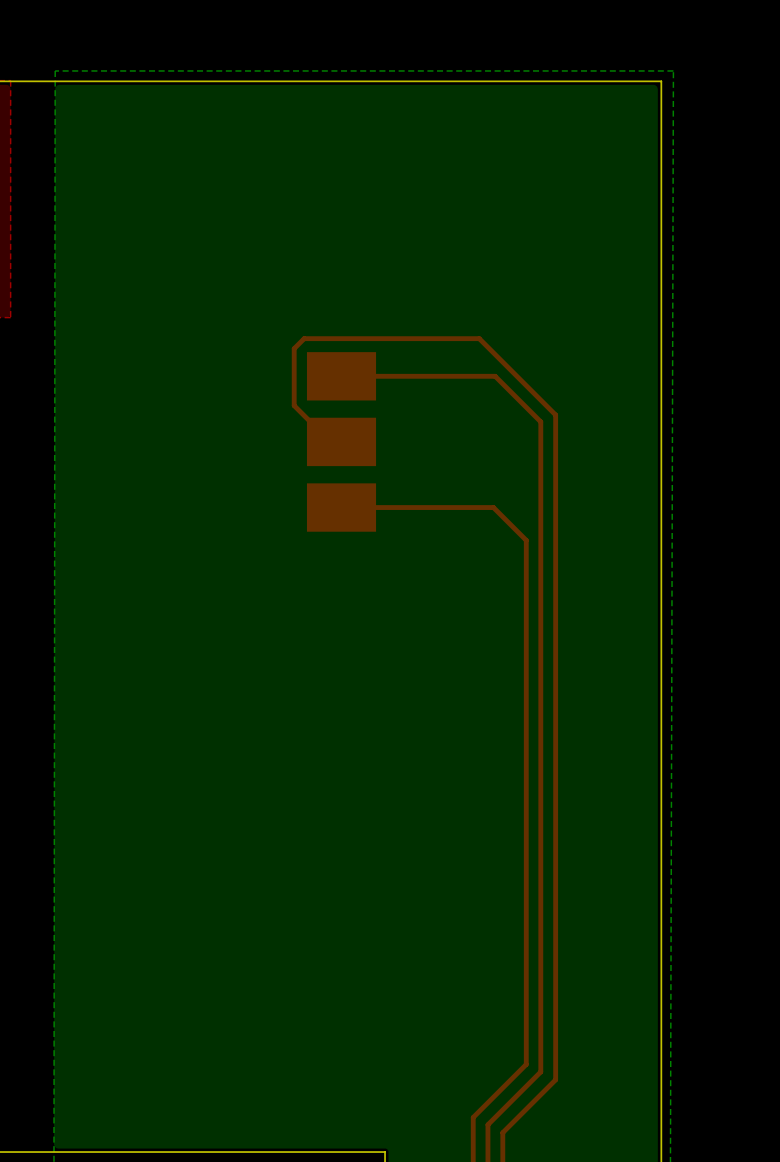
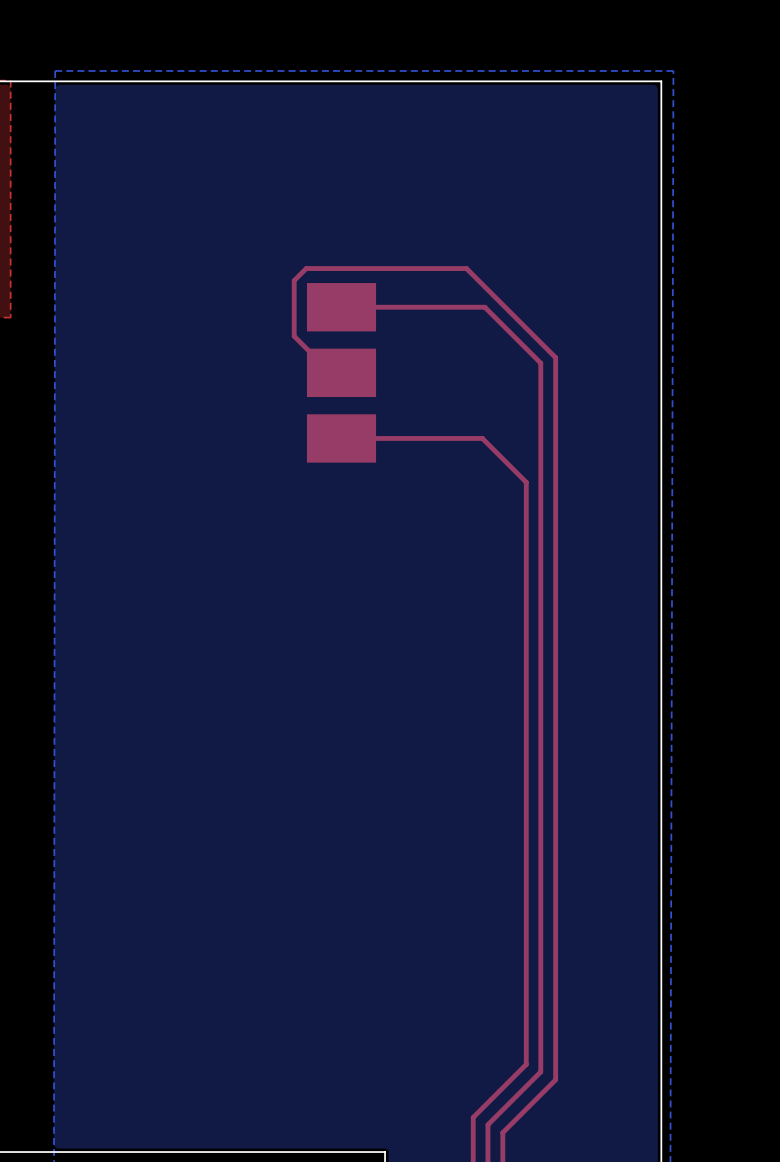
top track: (341, 376) (495, 376) (540, 421) -> (341, 307) (484, 307) (540, 363) (540, 421)
top track: (555, 414) (479, 338) (304, 338) (294, 348) (294, 405) (330, 441) (341, 441) -> (555, 414) (555, 357) (466, 268) (306, 268) (294, 280) (294, 336) (330, 372)
part position: (341, 441) -> (341, 372)
top track: (341, 507) (493, 507) (526, 540) -> (341, 438) (482, 438) (526, 482) (526, 540)

